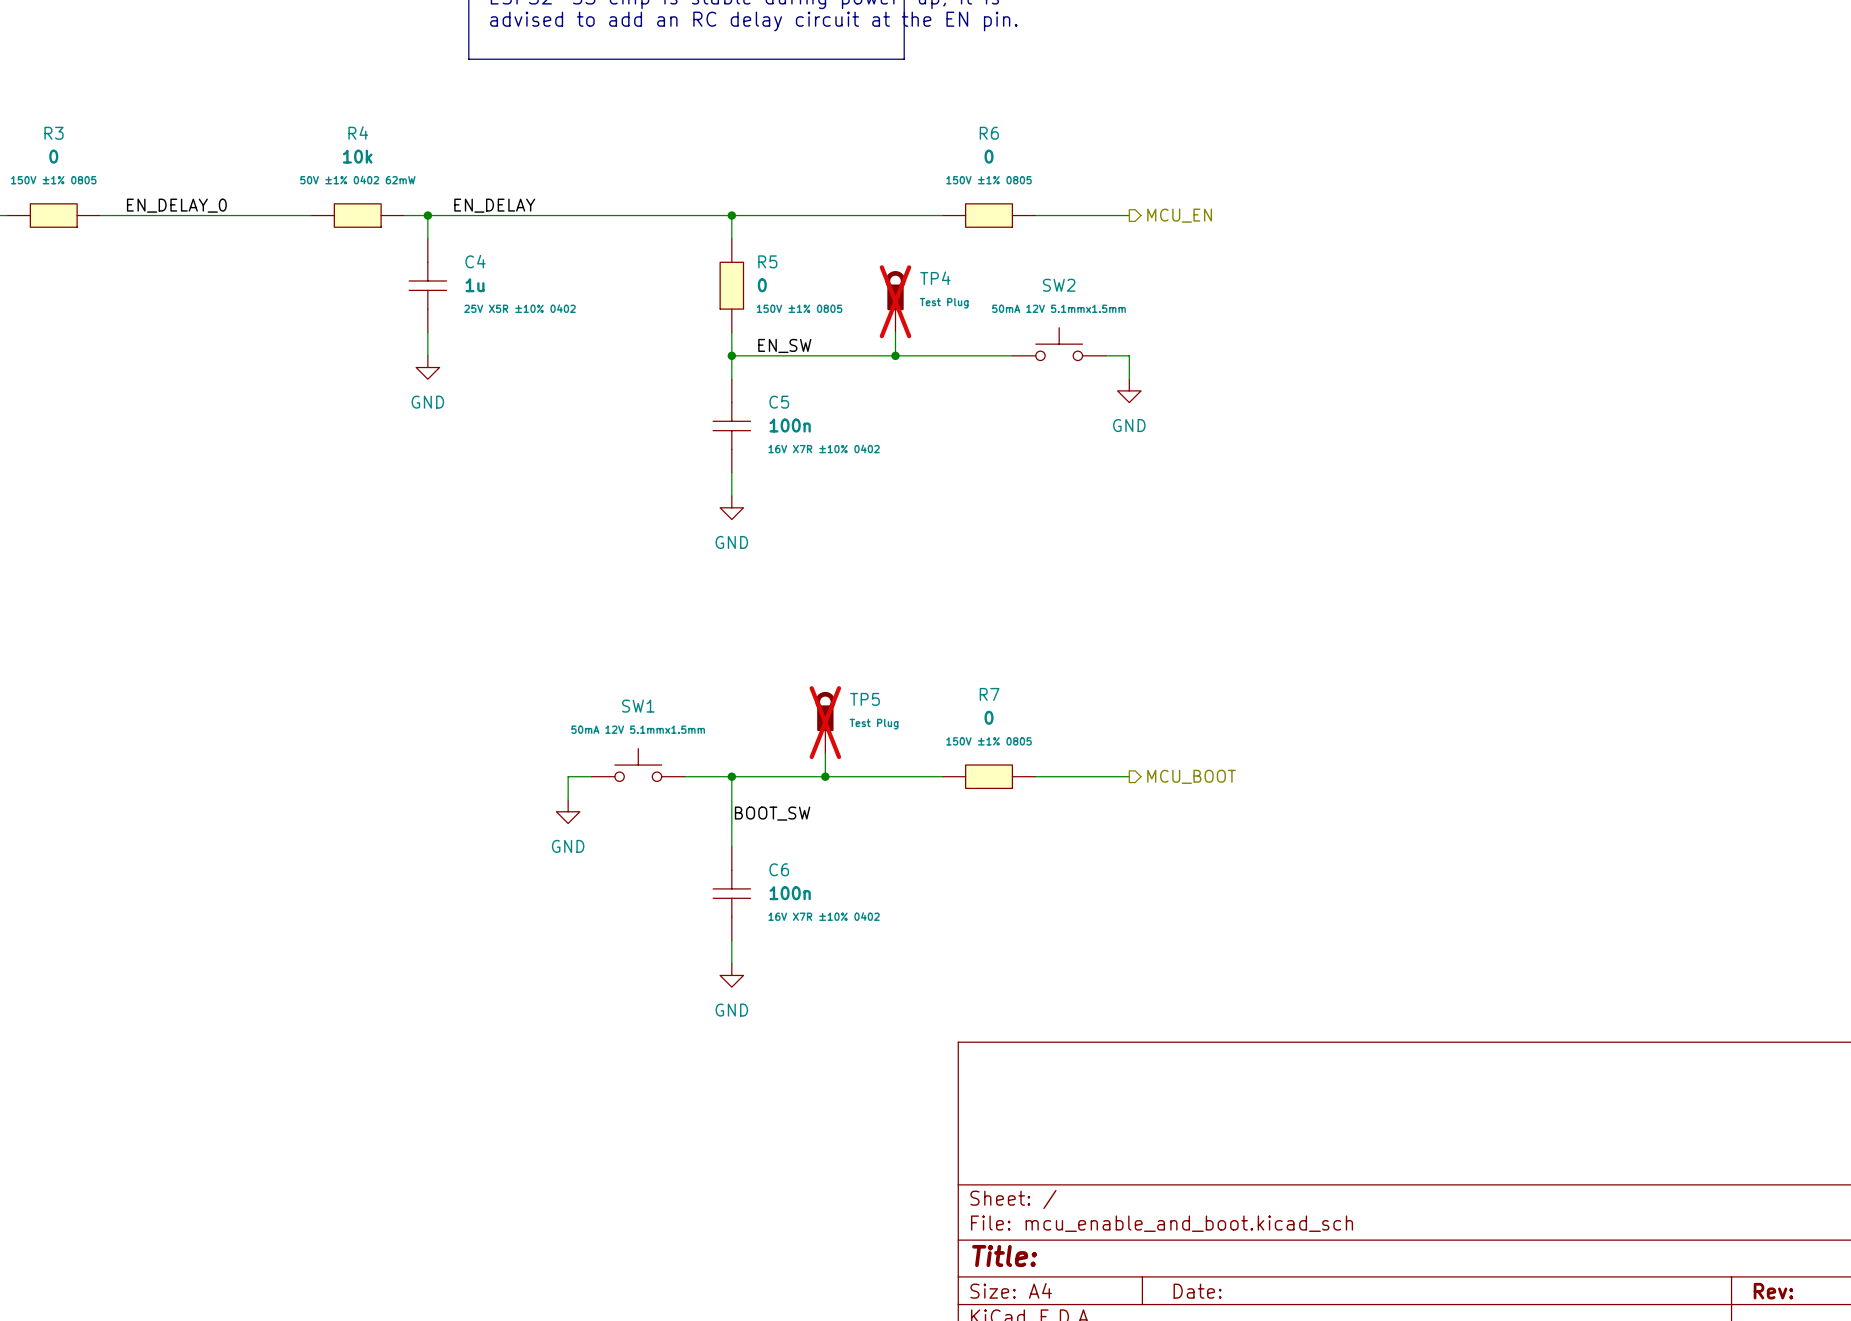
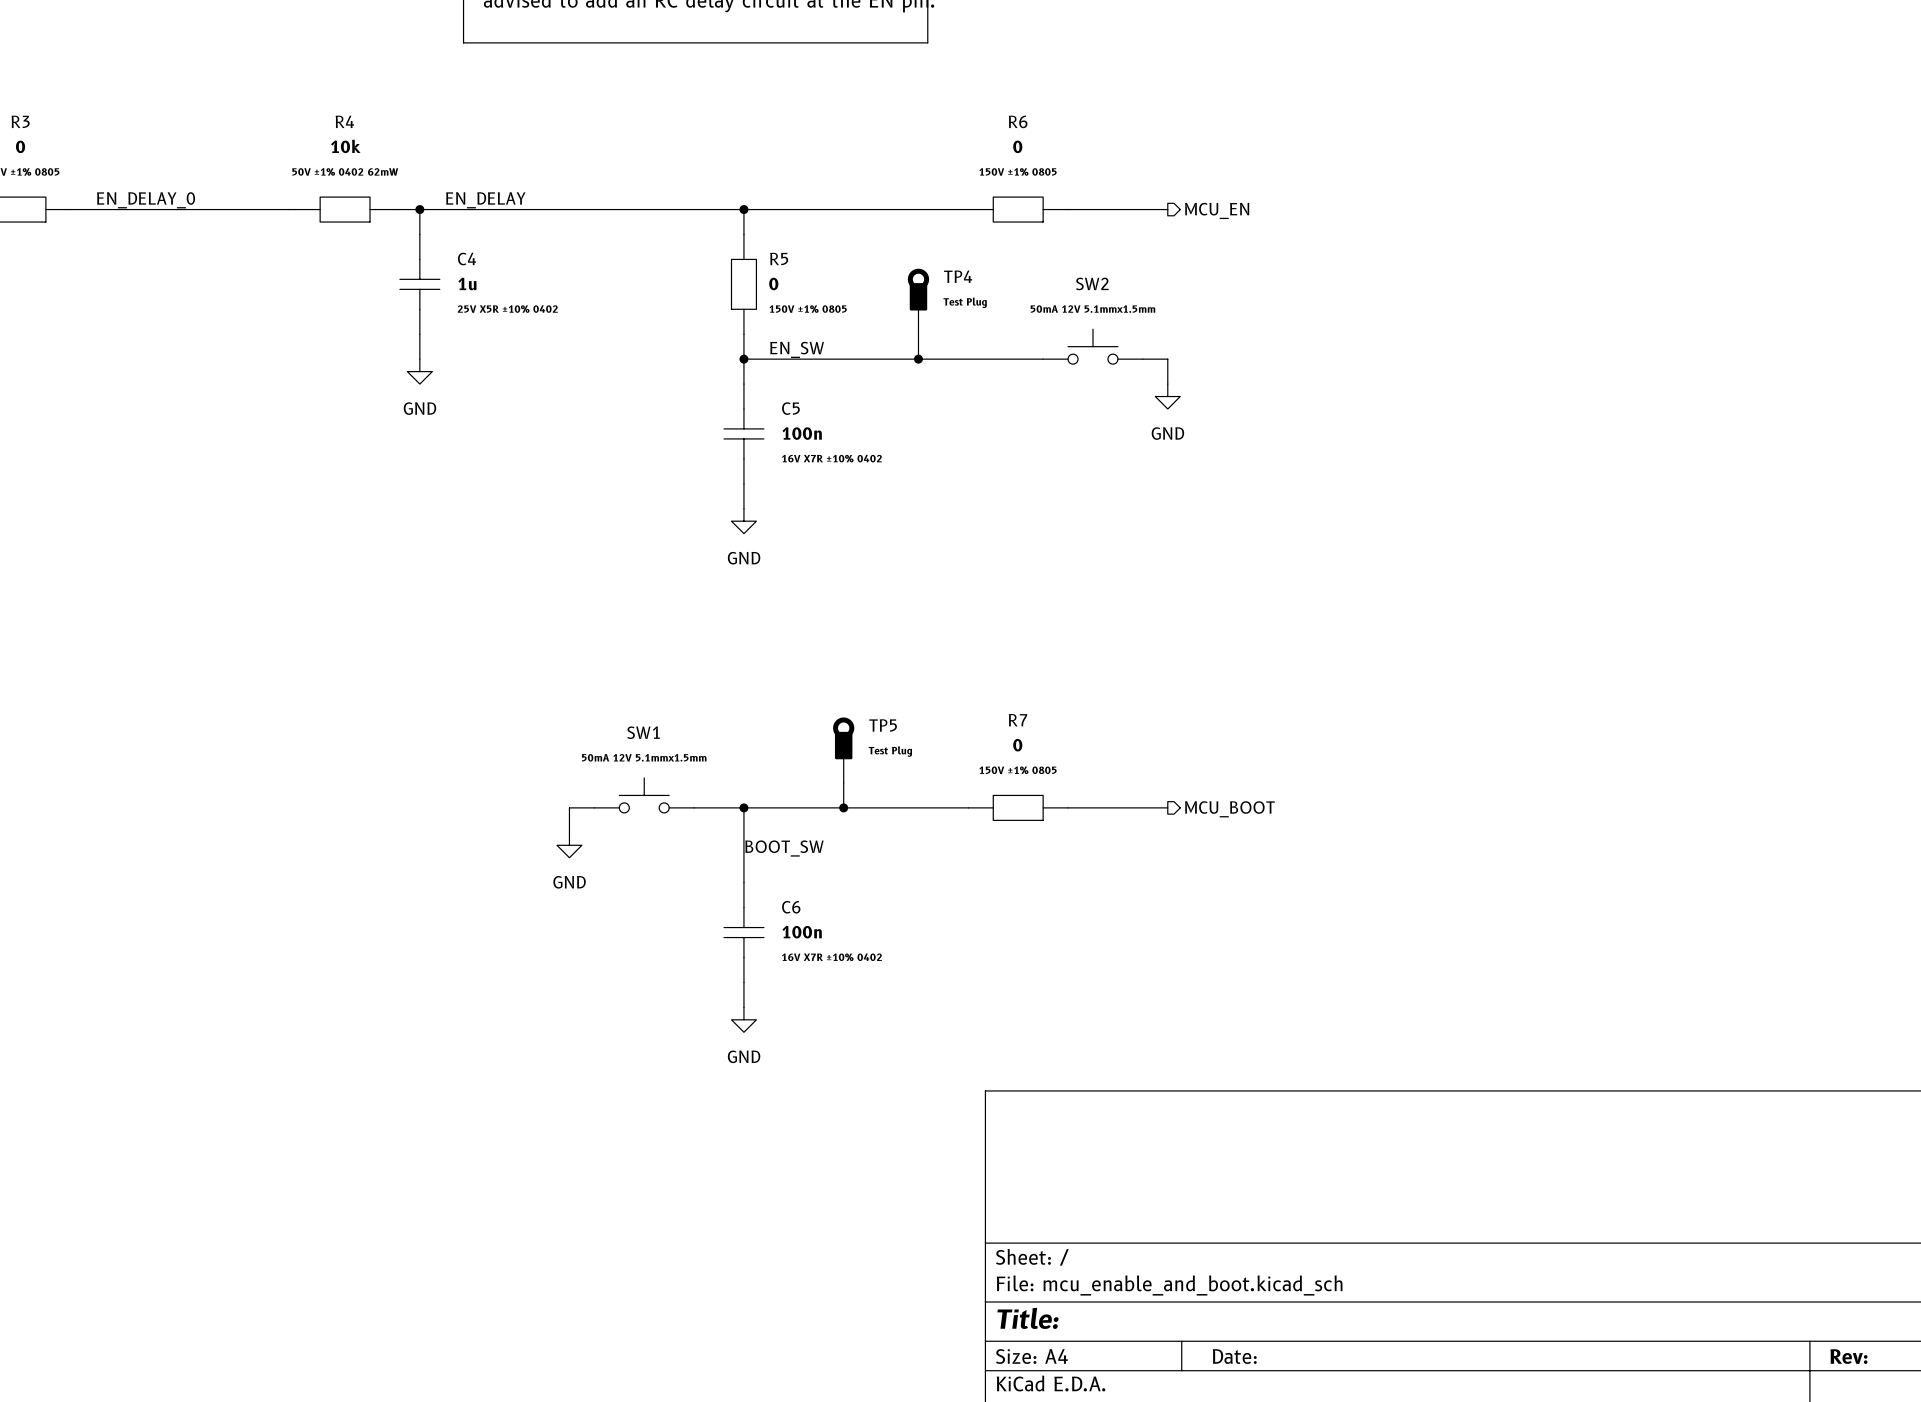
TP4 do-not-place cross: (895, 301) -> none
TP5 do-not-place cross: (825, 722) -> none

